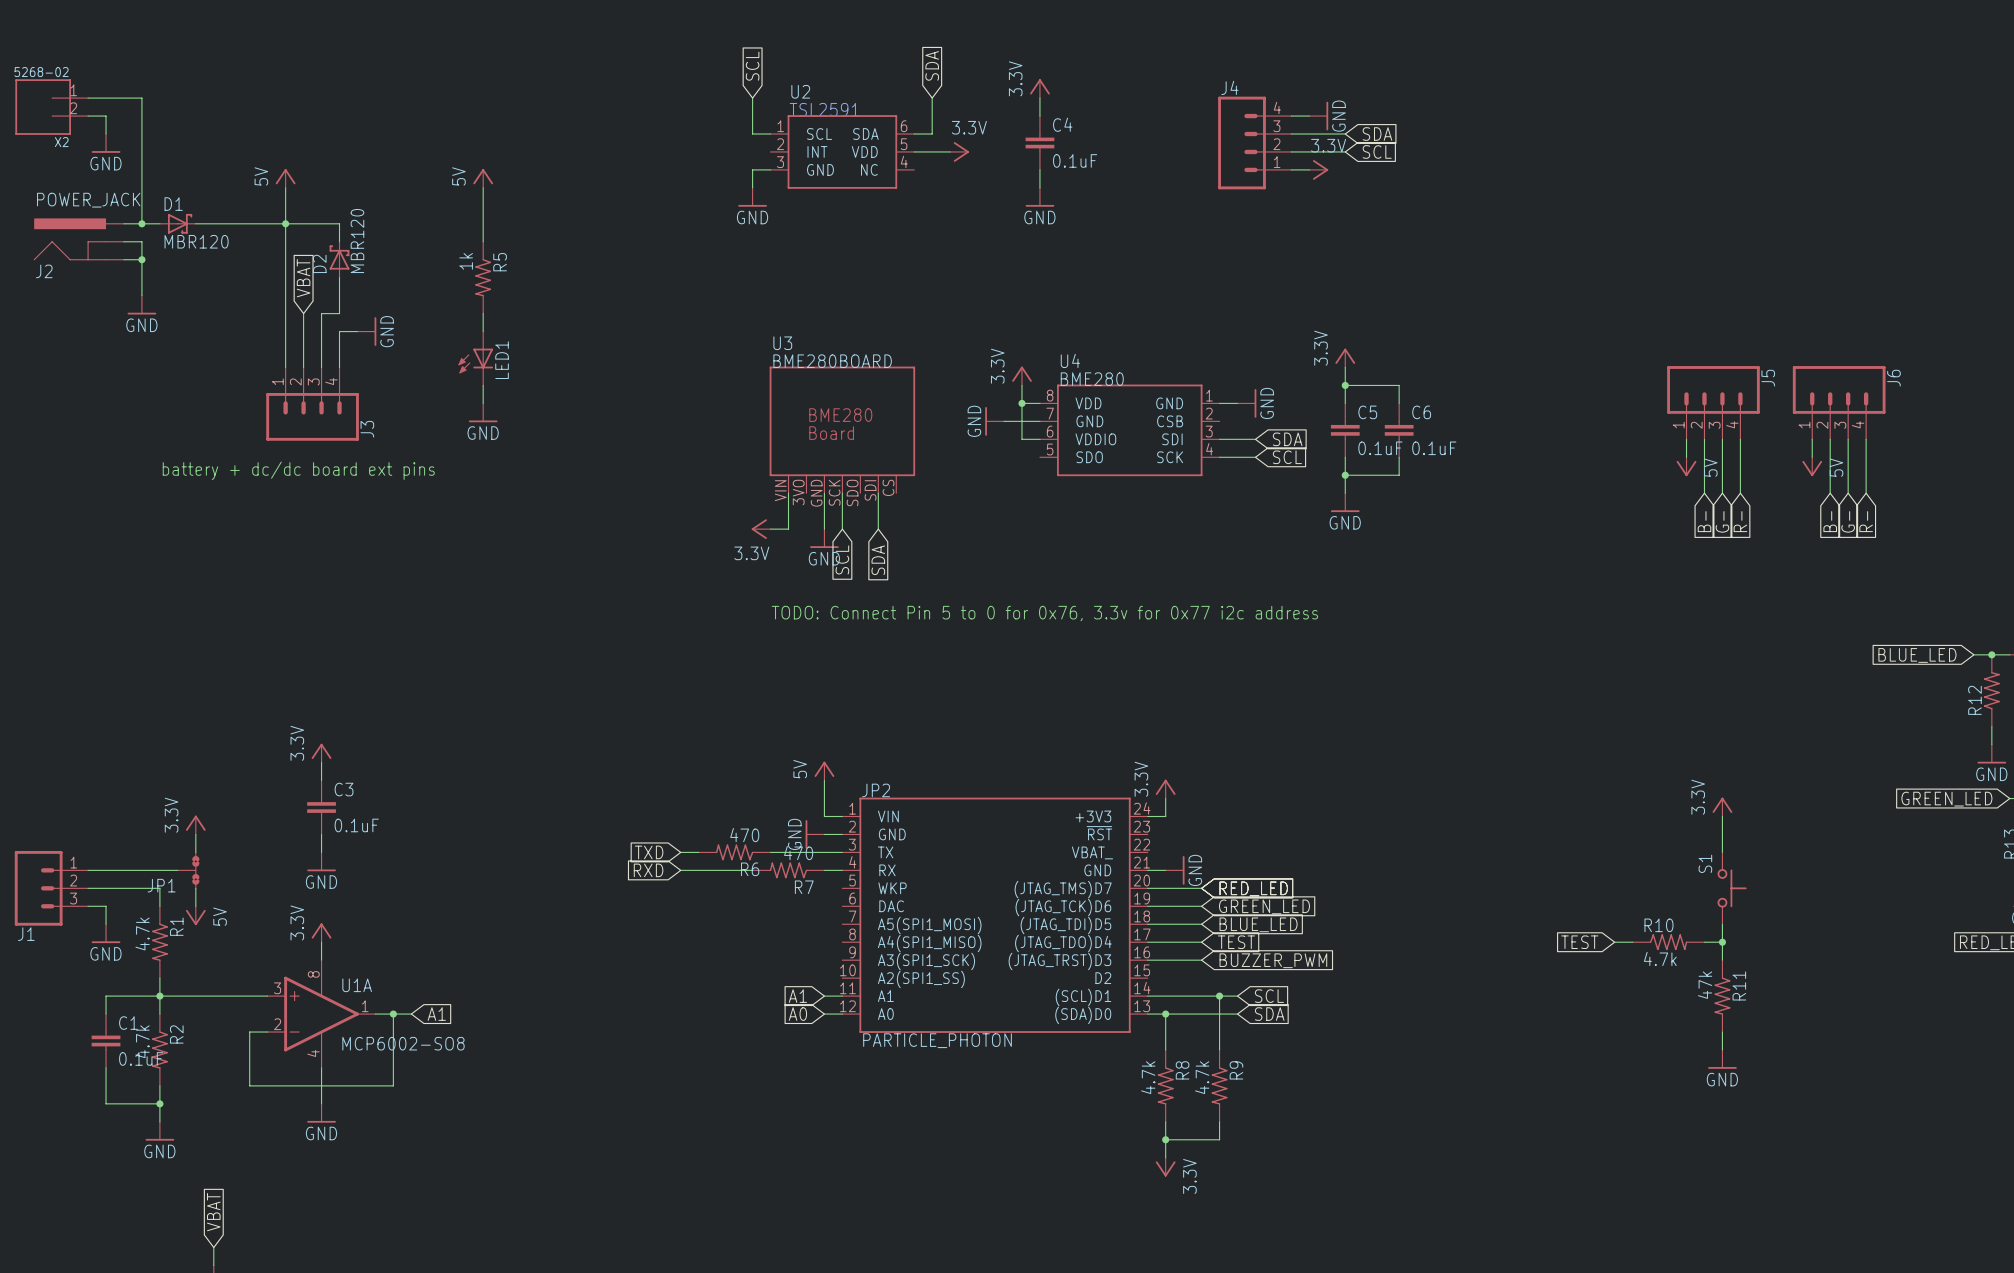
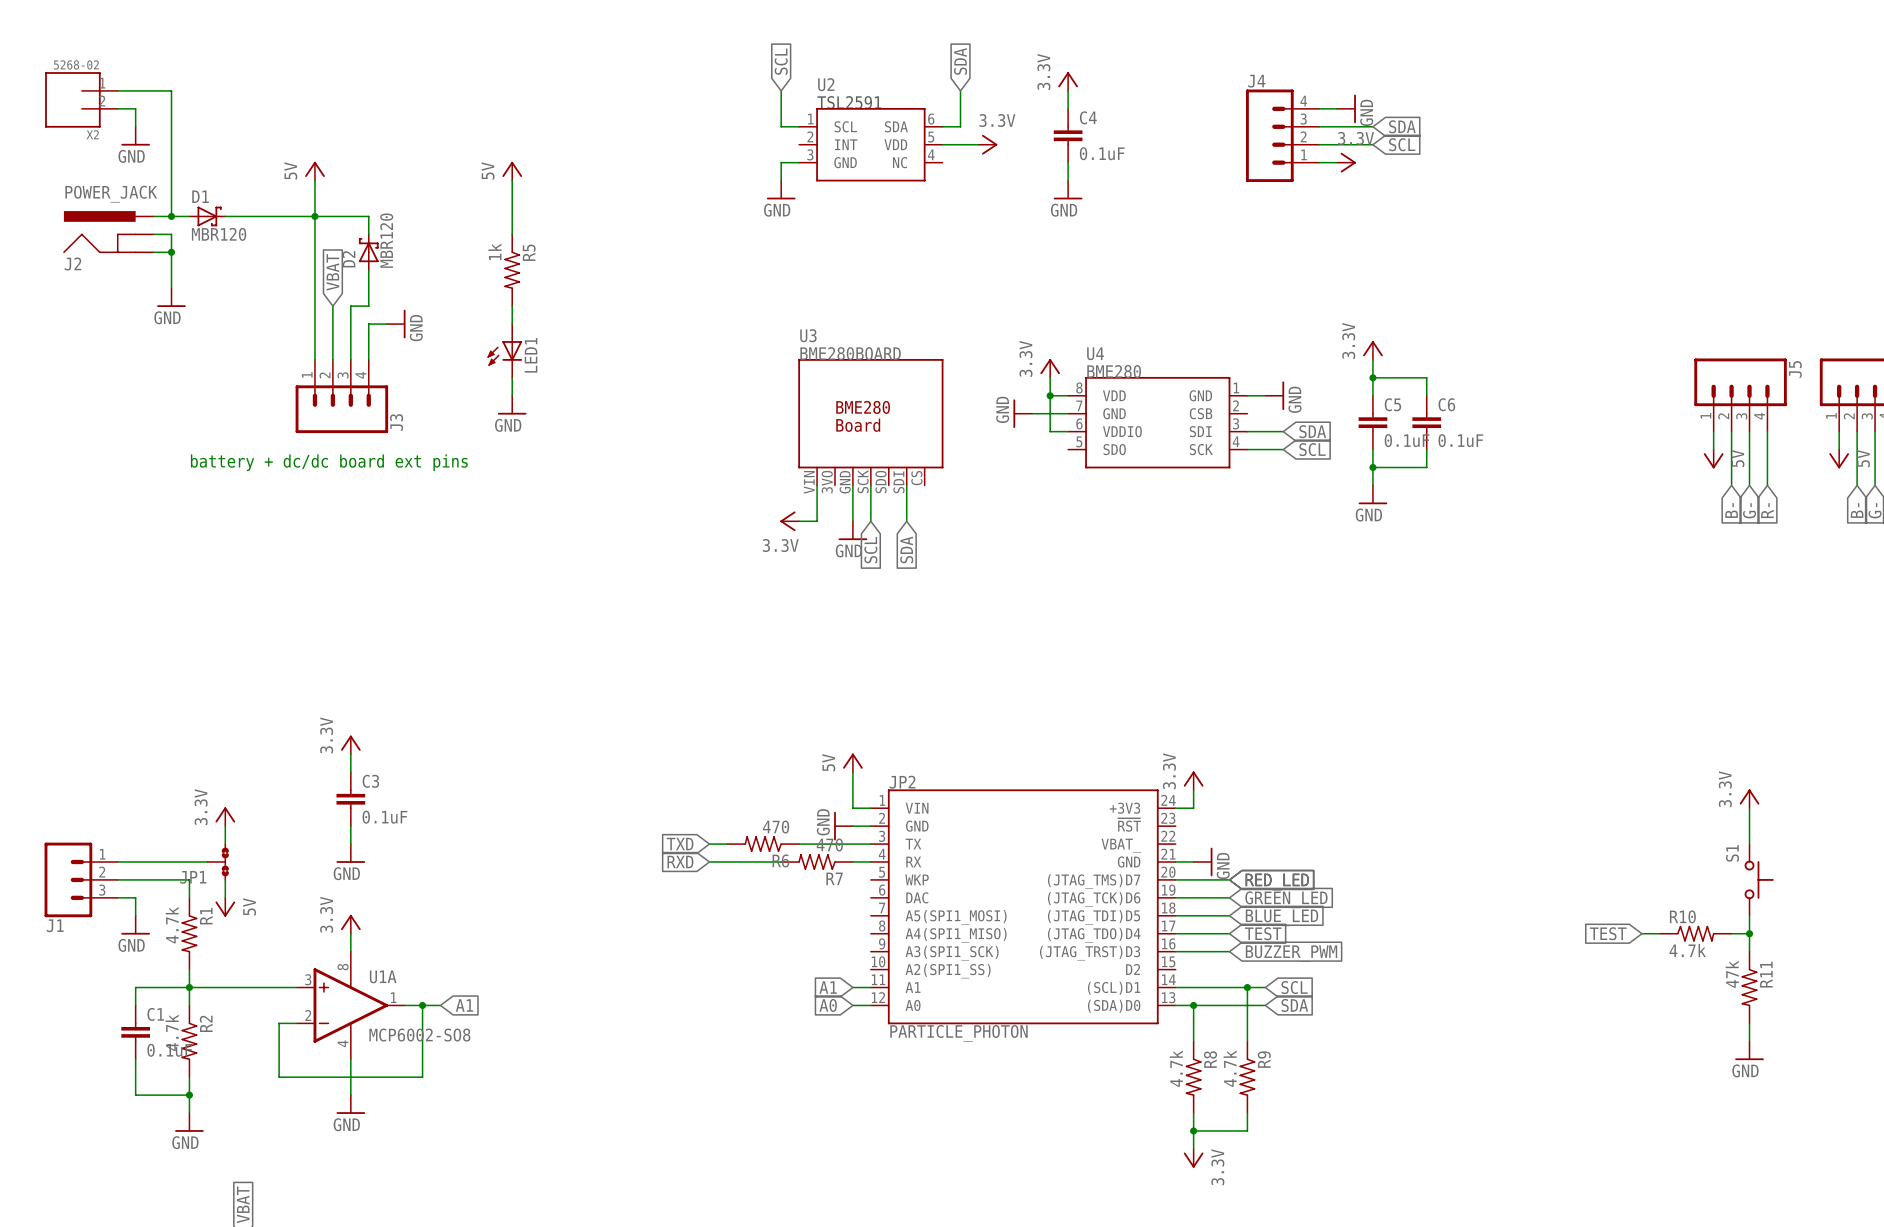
text: TODO: Connect Pin 5 to 0 for 0x76, 3.3v for 0x77 i2c address (1044, 613) -> none

